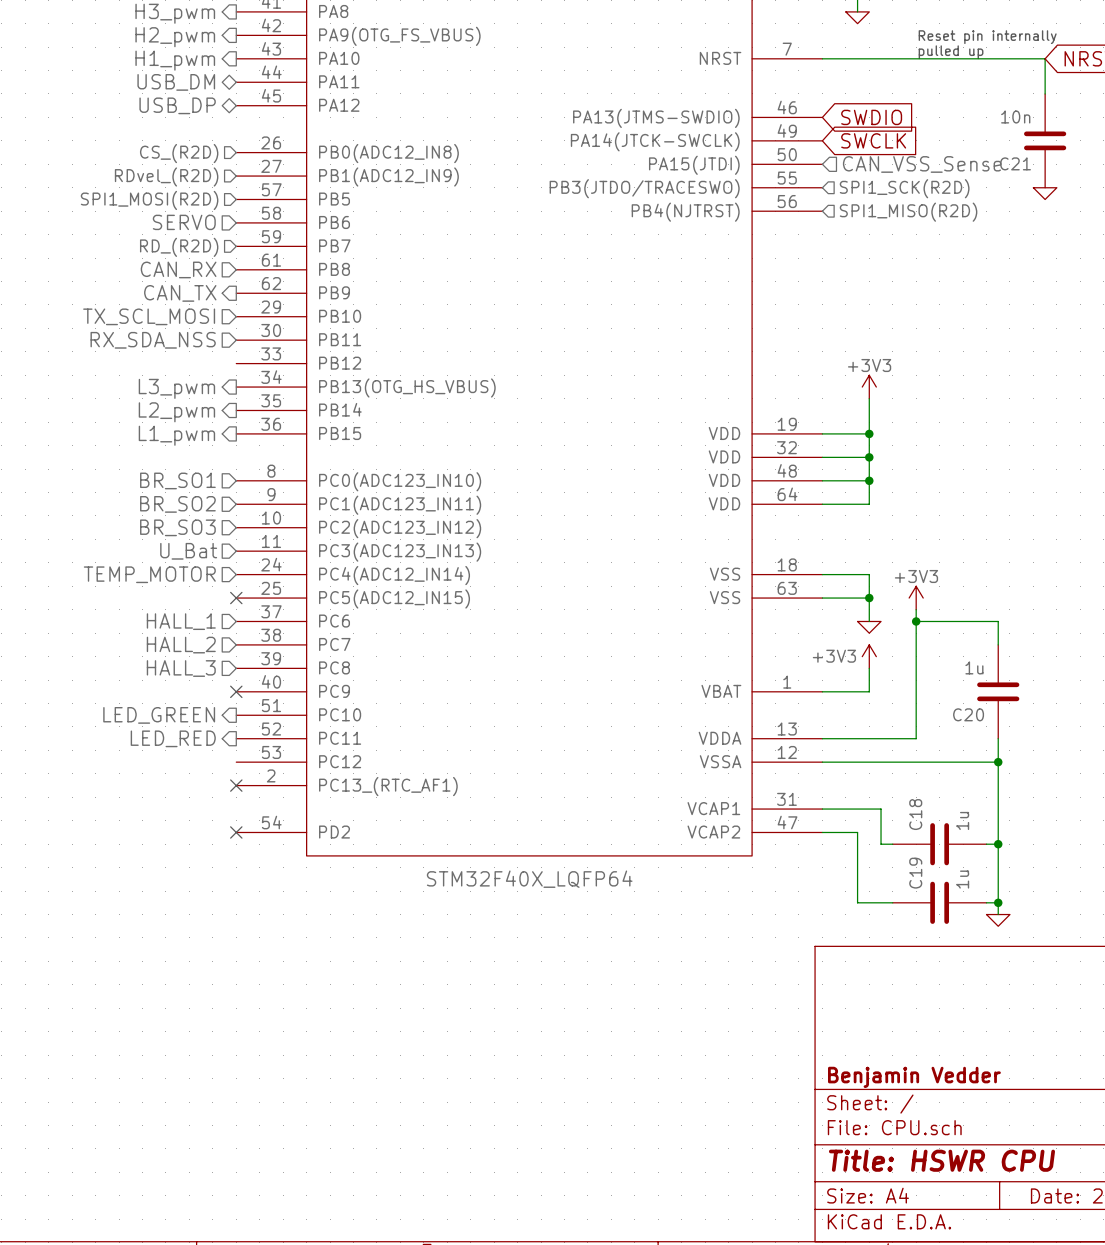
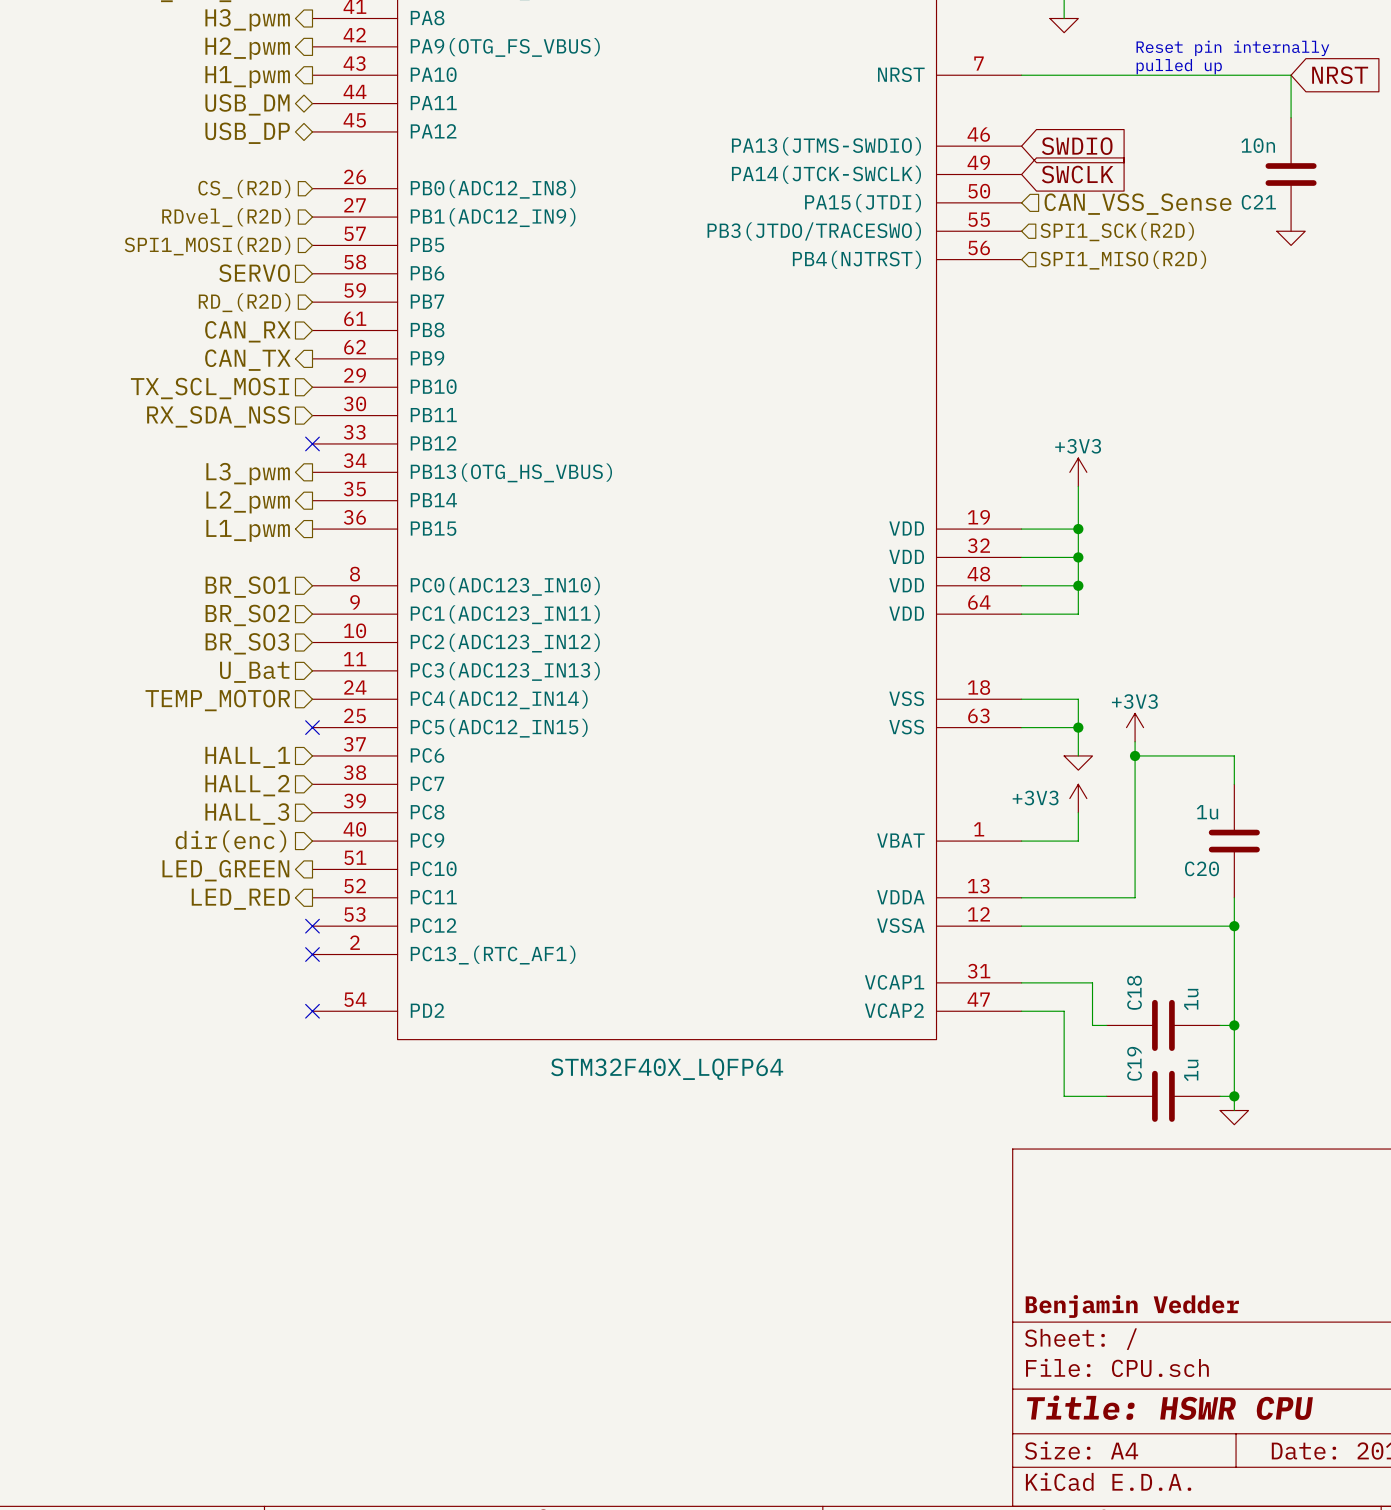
no-connect mark: none -> (312, 443)
no-connect mark: (236, 691) -> none
hierarchical label: none -> dir(enc) (230, 841)
no-connect mark: none -> (312, 926)

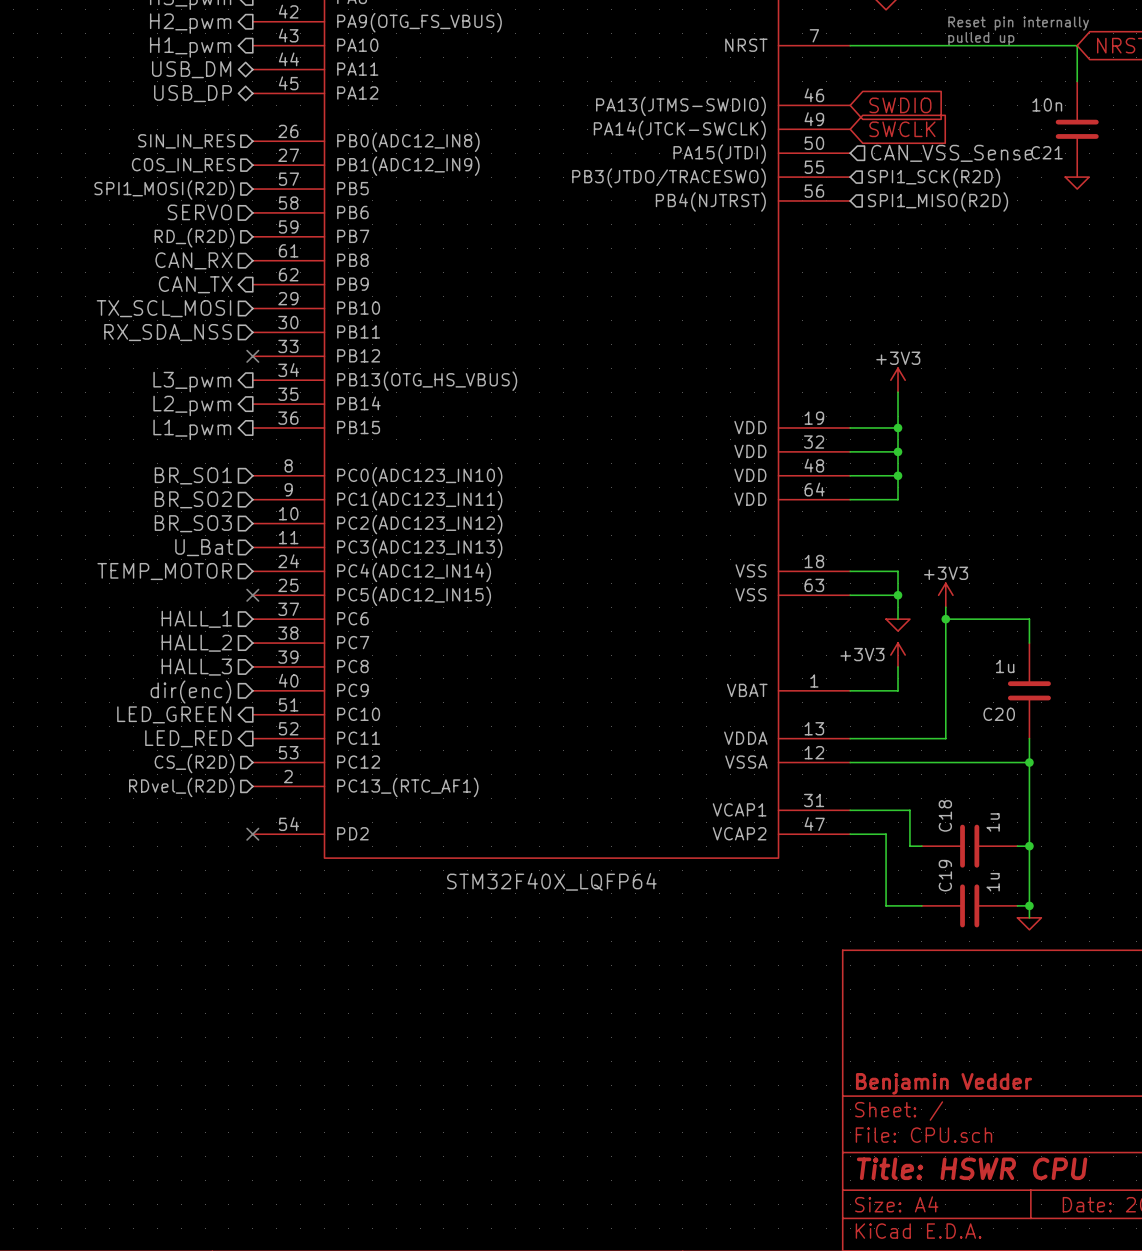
hierarchical label: CS_(R2D) (244, 189) -> SIN_IN_RES (186, 141)
hierarchical label: RDvel_(R2D) (226, 217) -> COS_IN_RES (183, 165)
hierarchical label: none -> CS_(R2D) (194, 763)
no-connect mark: (312, 926) -> none
no-connect mark: (312, 954) -> none
hierarchical label: none -> RDvel_(R2D) (181, 787)

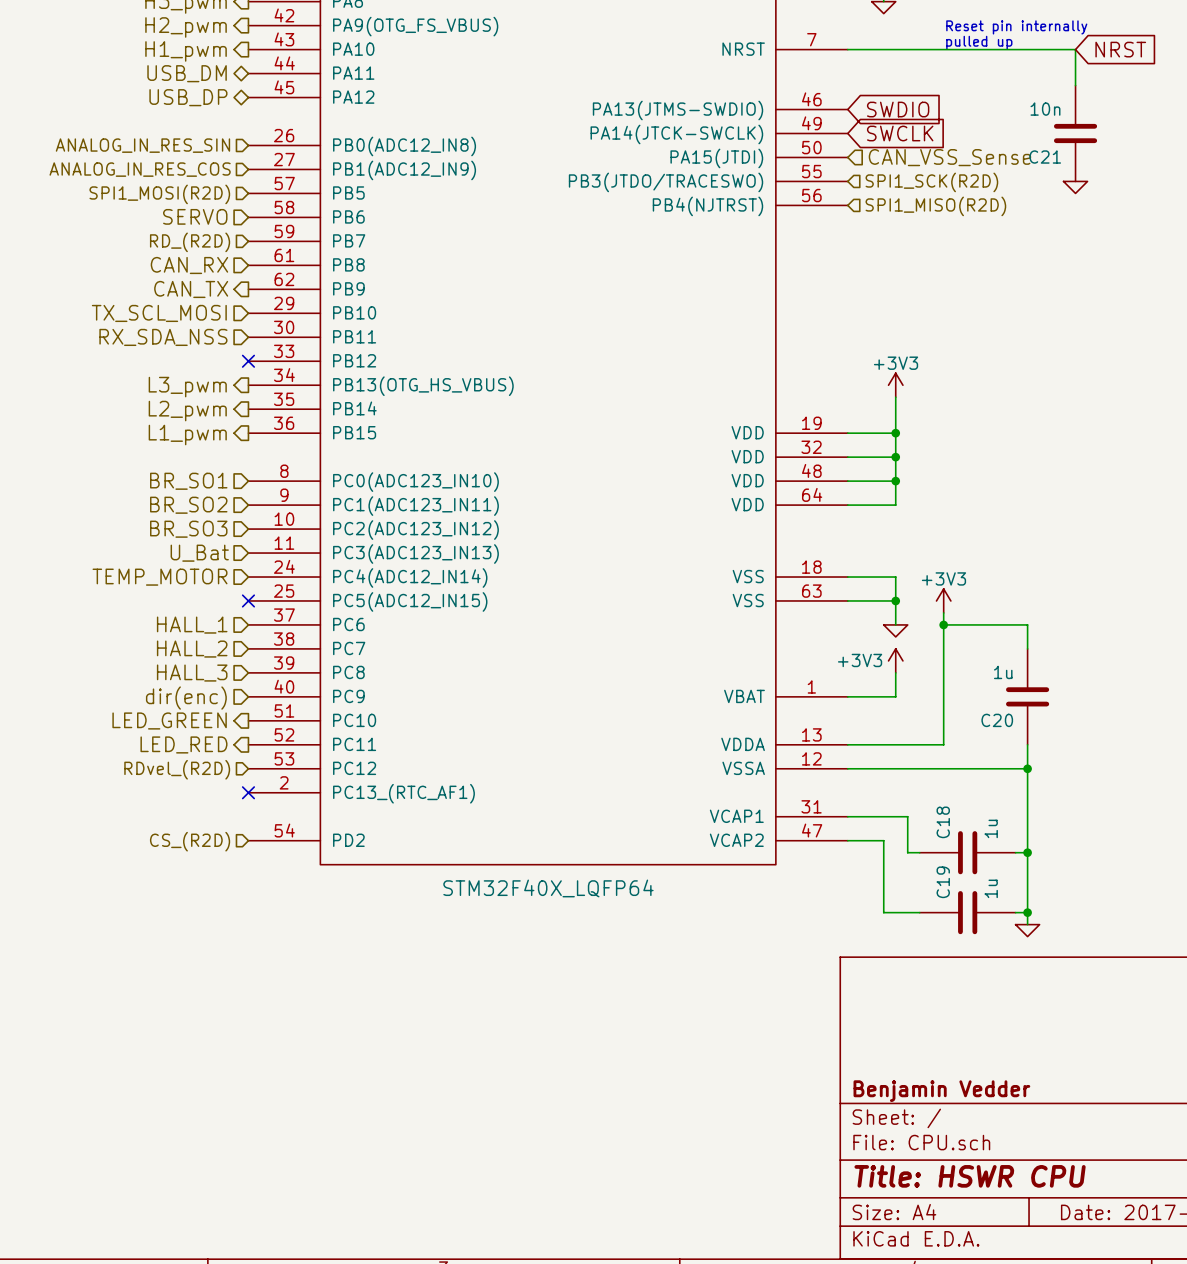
hierarchical label: SIN_IN_RES (186, 141) -> ANALOG_IN_RES_SIN (142, 145)
hierarchical label: COS_IN_RES (183, 165) -> ANALOG_IN_RES_COS (140, 169)
hierarchical label: CS_(R2D) (194, 763) -> RDvel_(R2D) (177, 769)
hierarchical label: RDvel_(R2D) (181, 787) -> none
no-connect mark position: (252, 834) -> (248, 792)
hierarchical label: none -> CS_(R2D) (190, 841)

